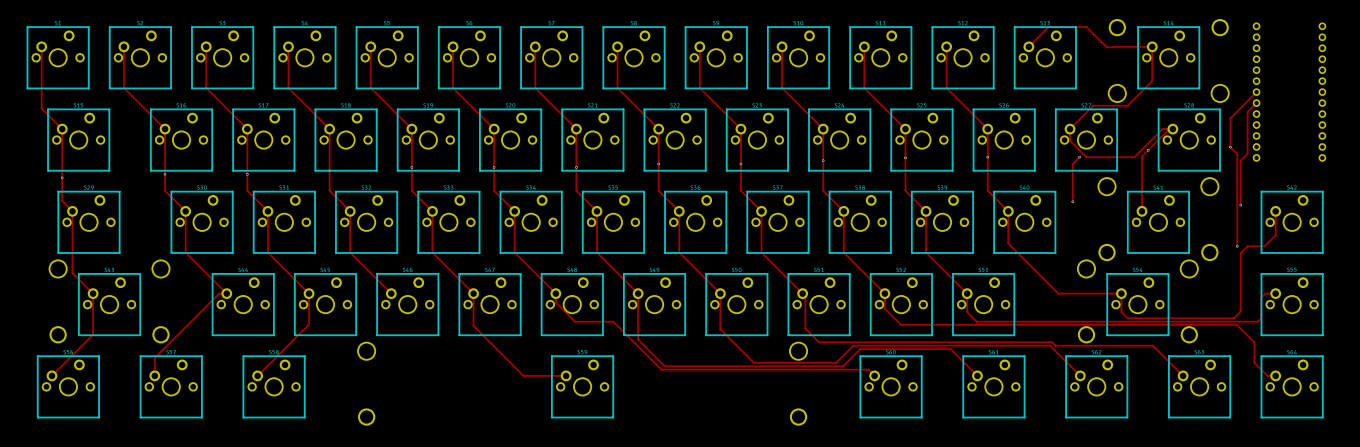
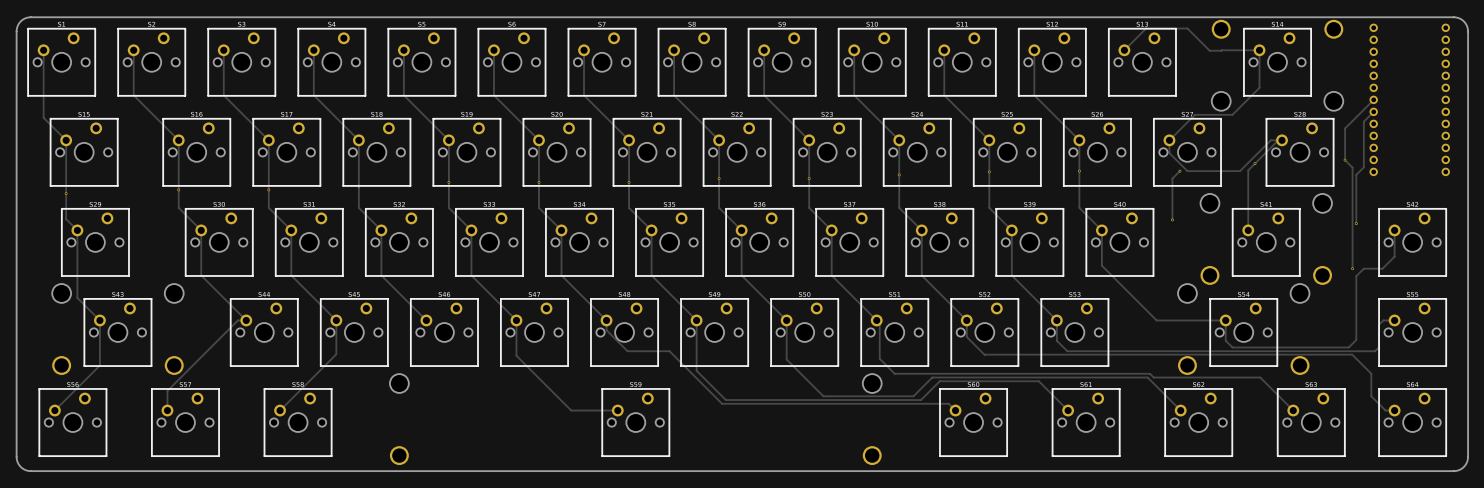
board edge: none -> (30, 17) (1457, 17) (1465, 22) (1468, 31) (1467, 460) (1462, 468) (1453, 471) (27, 470) (19, 465) (16, 456) (16, 31) (20, 21) (30, 17)

